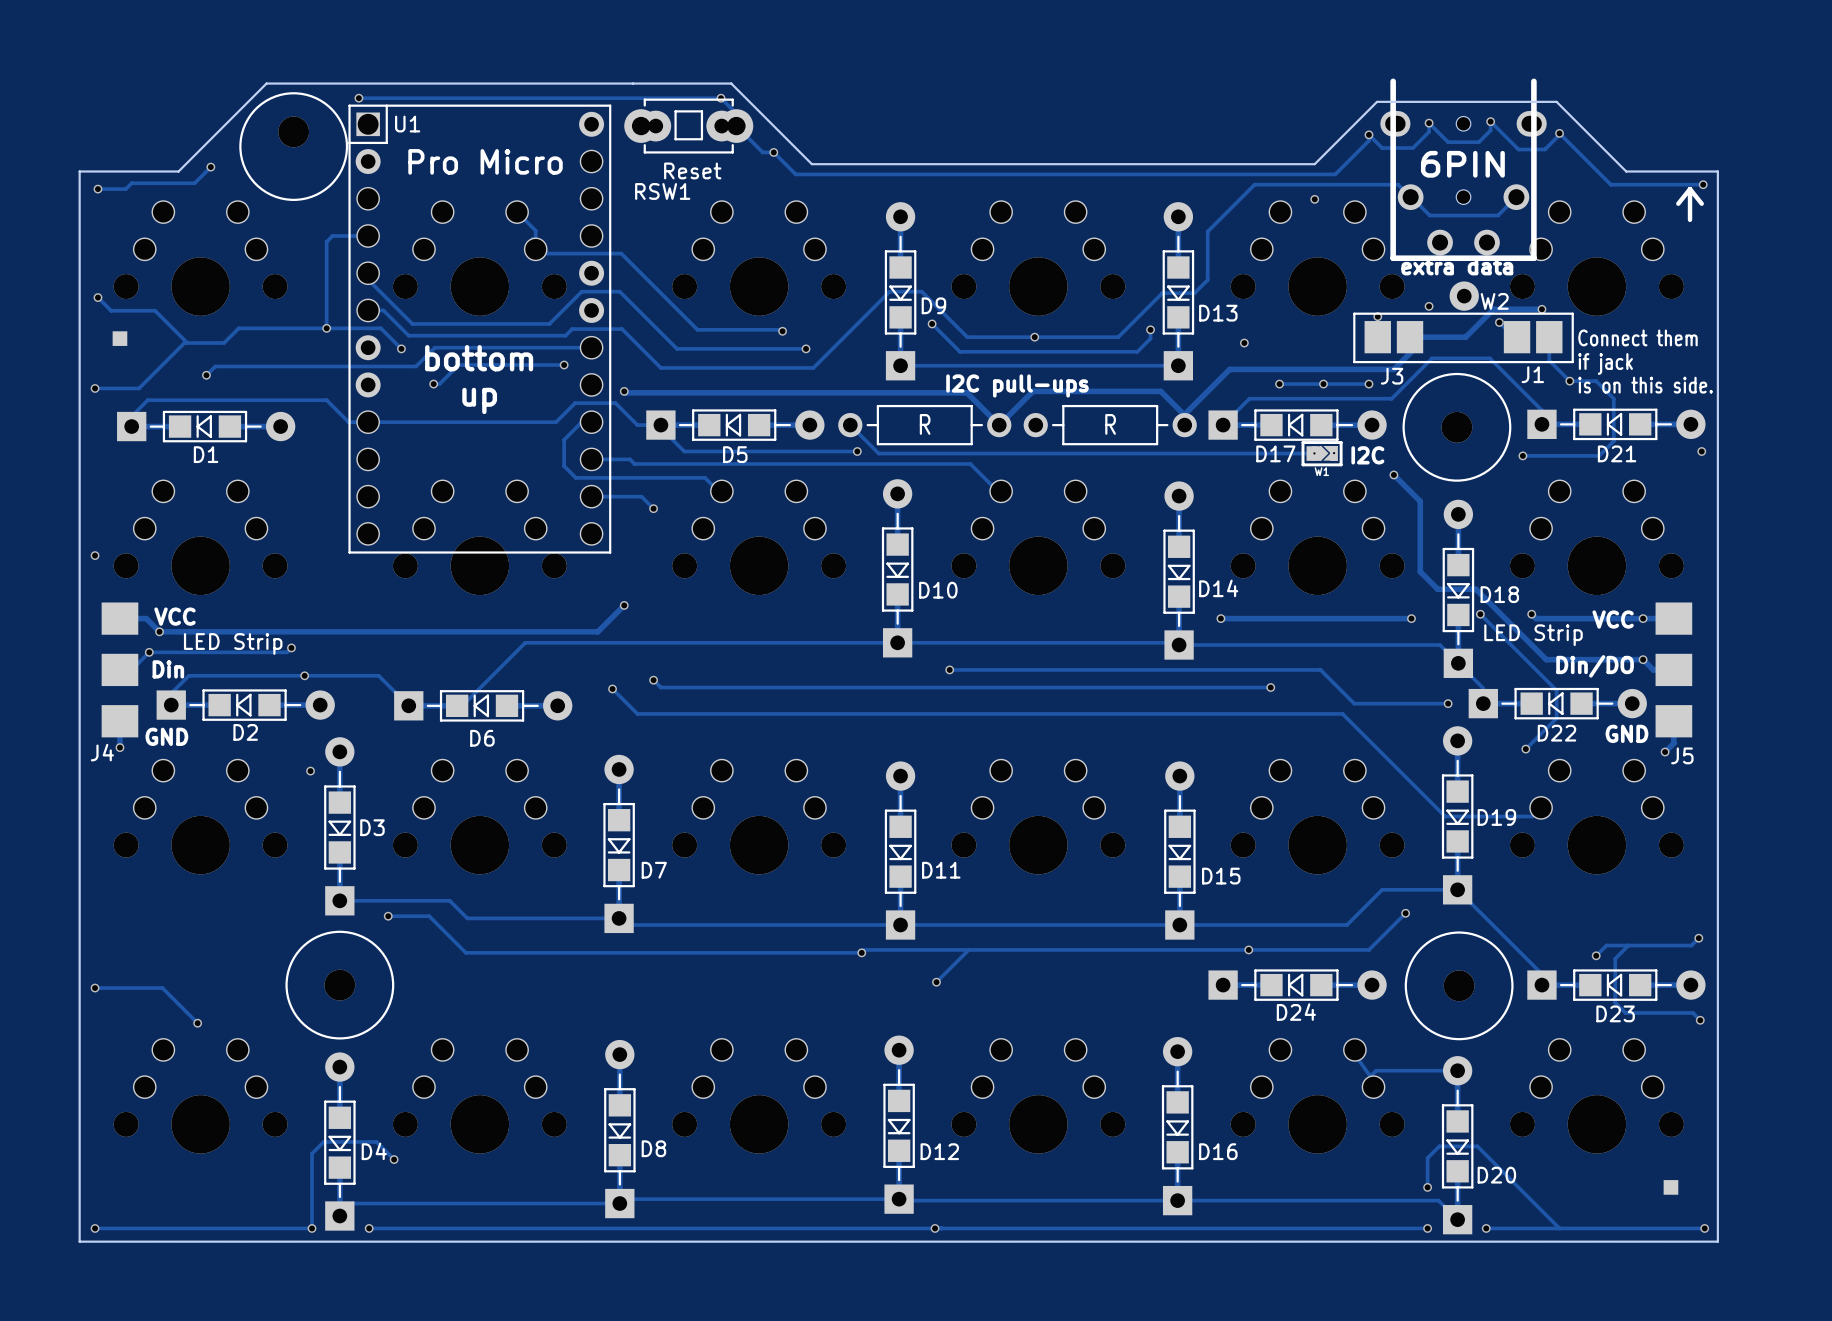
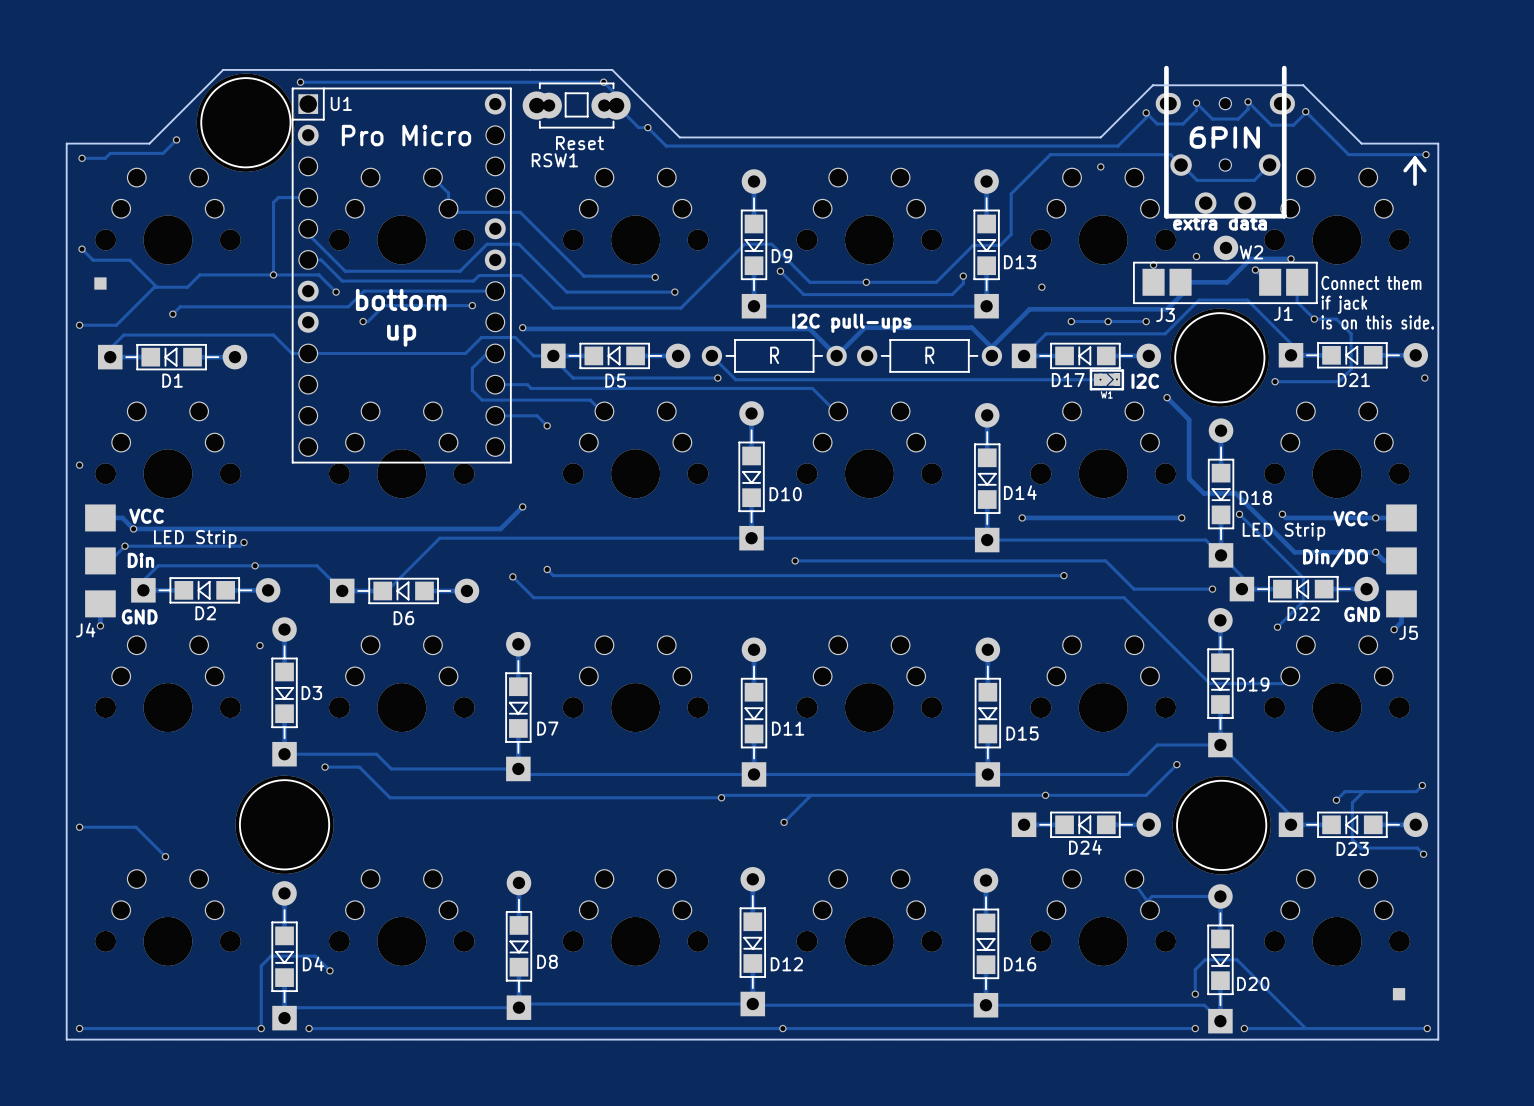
part footprint: [239, 92, 349, 201] -> [196, 73, 295, 172]
part footprint: [1402, 372, 1512, 482] -> [1170, 308, 1269, 407]
part footprint: [285, 930, 395, 1040] -> [235, 775, 334, 874]
part footprint: [1404, 931, 1514, 1041] -> [1172, 776, 1271, 875]

